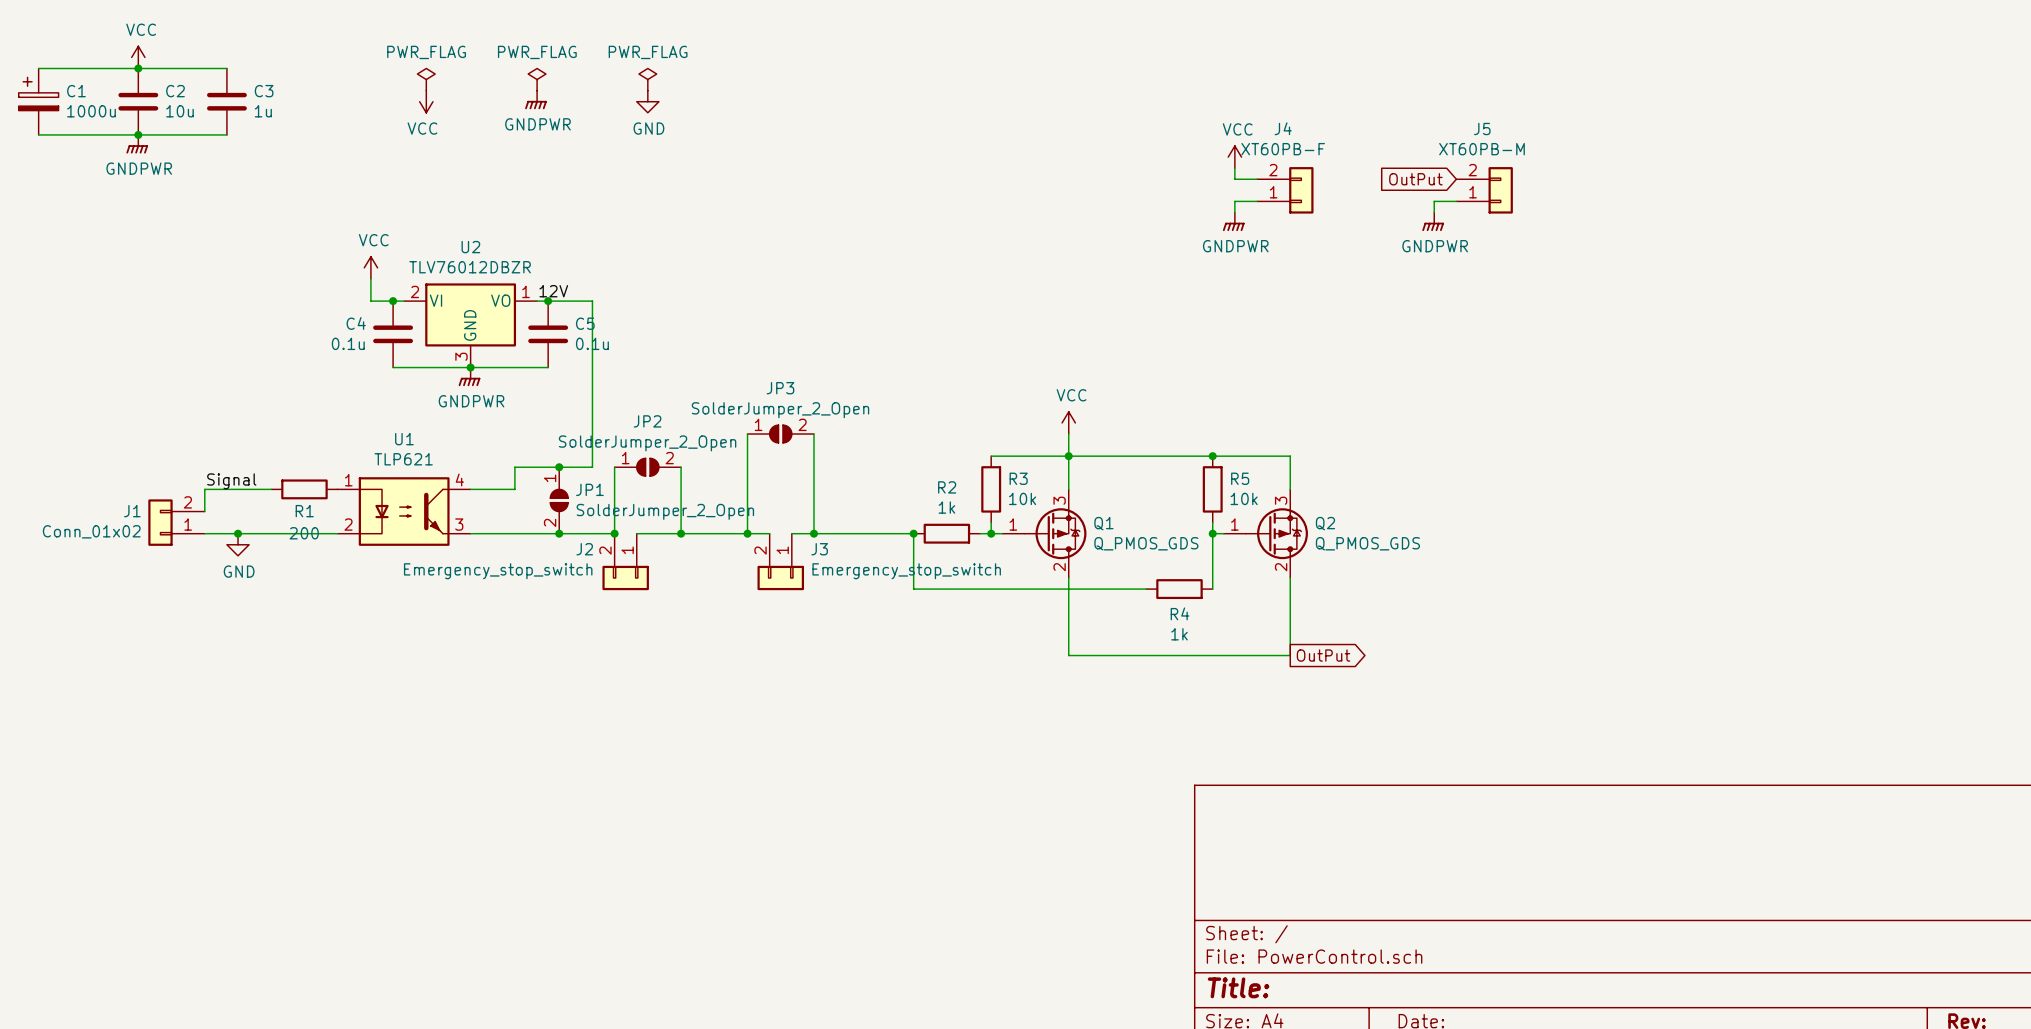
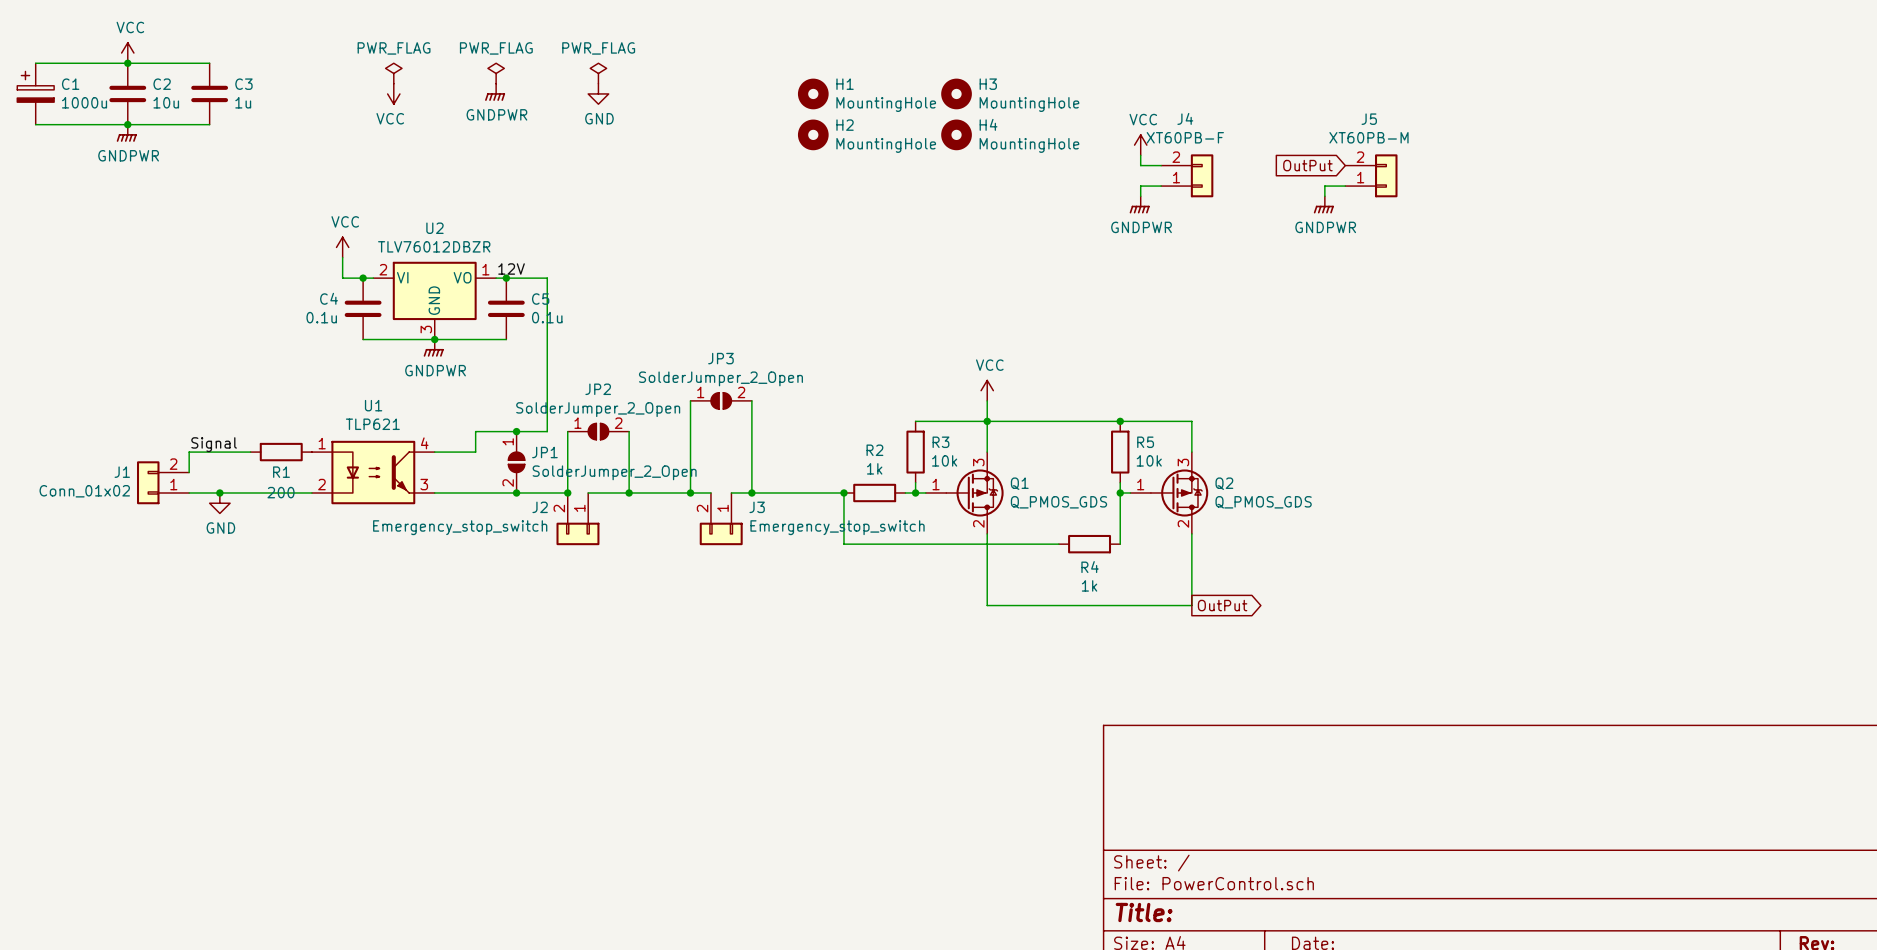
H1: none -> MountingHole (813, 93)
H3: none -> MountingHole (956, 93)
H2: none -> MountingHole (813, 134)
H4: none -> MountingHole (956, 134)

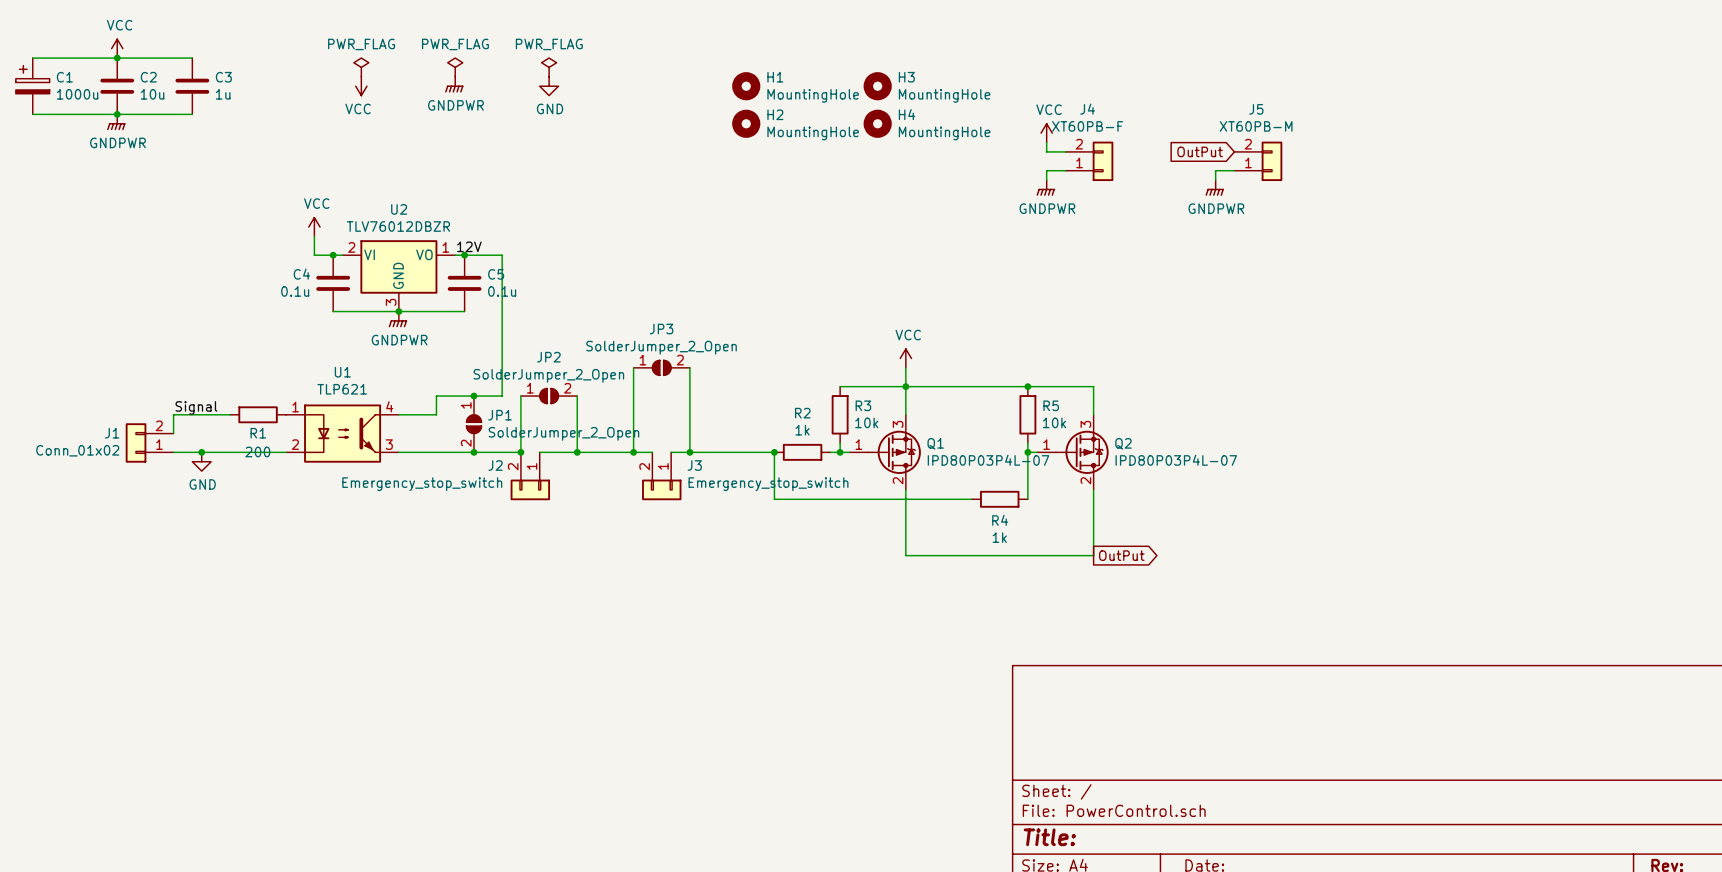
Q1 value: Q_PMOS_GDS (1058, 502) -> IPD80P03P4L-07 (988, 460)
Q2 value: Q_PMOS_GDS (1263, 502) -> IPD80P03P4L-07 (1176, 460)

